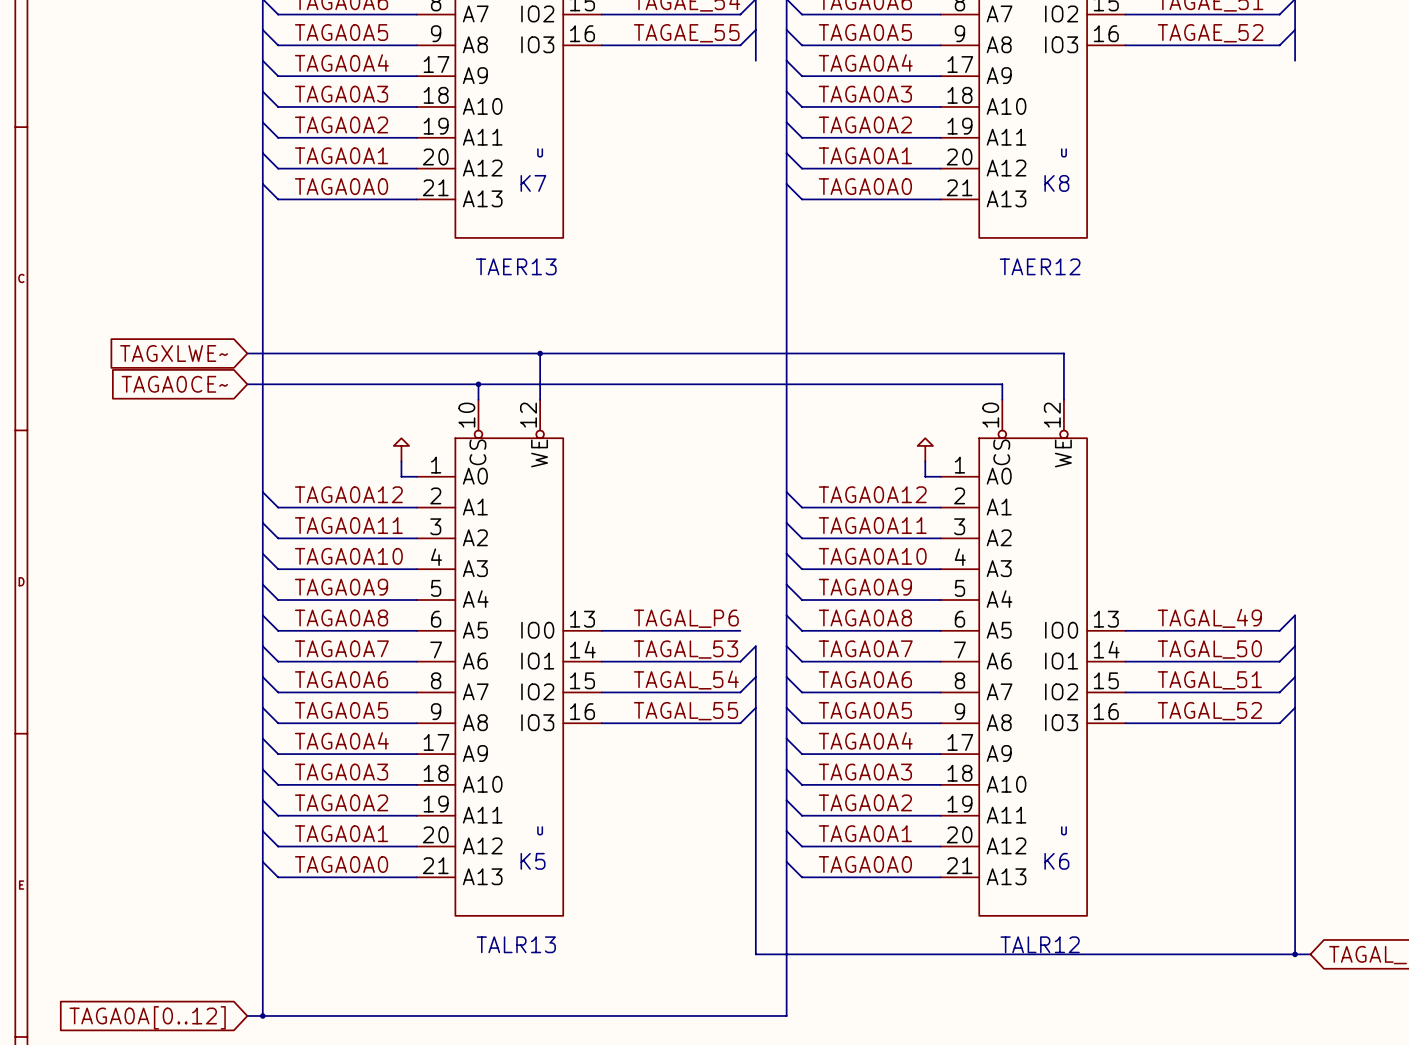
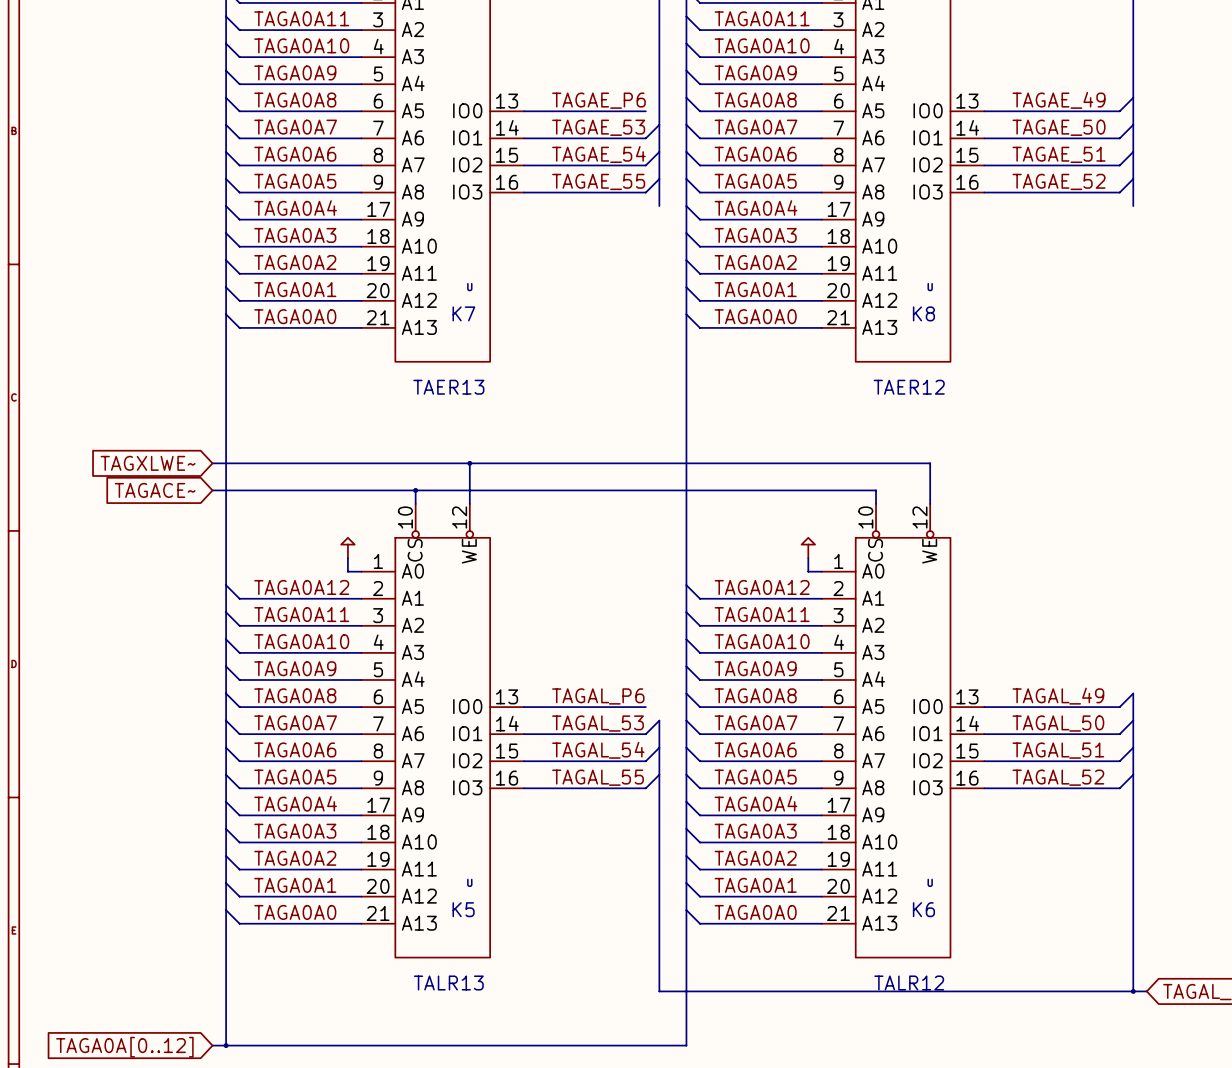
global label: TAGA0CE~ (174, 384) -> TAGACE~ (155, 490)

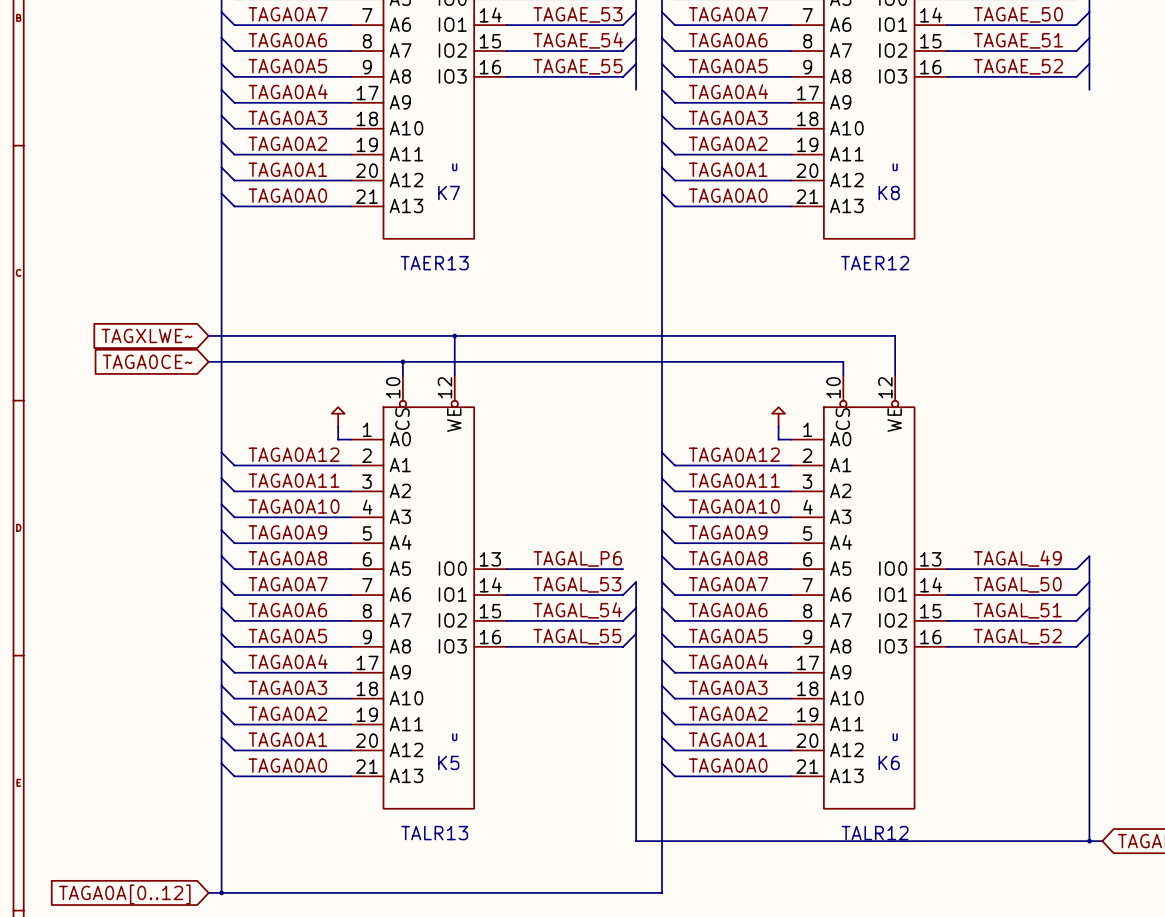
global label: TAGACE~ (155, 490) -> TAGA0CE~ (147, 361)

